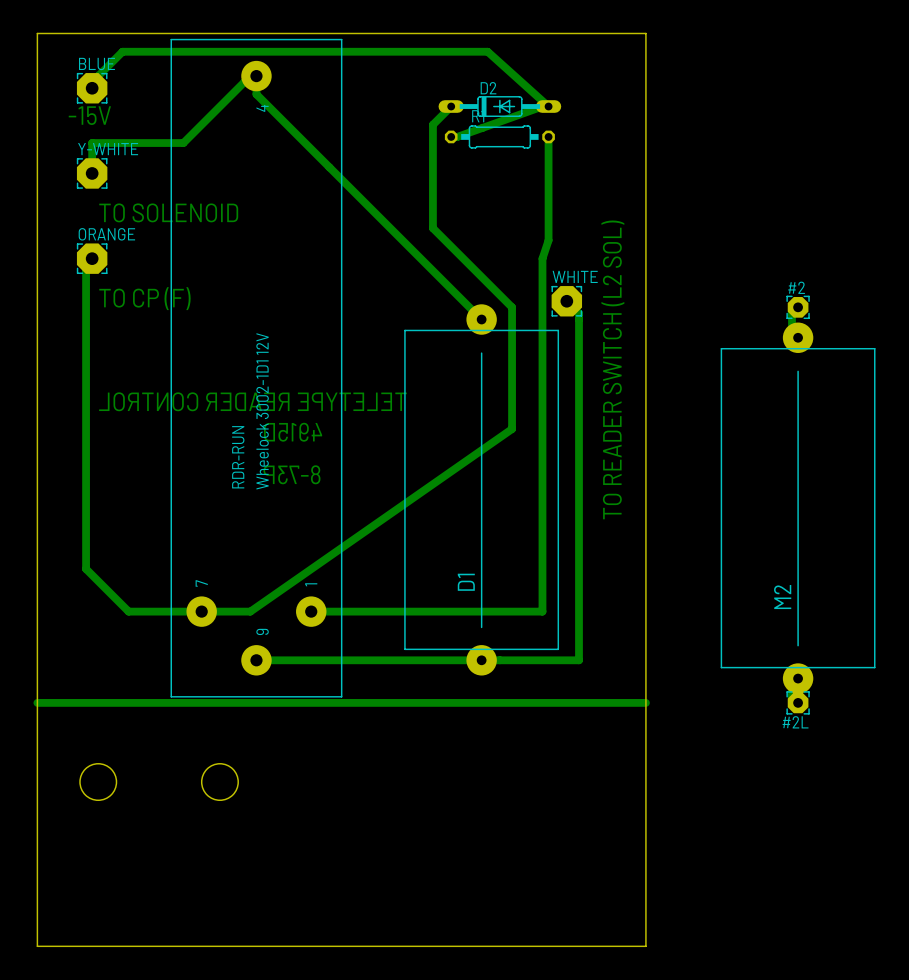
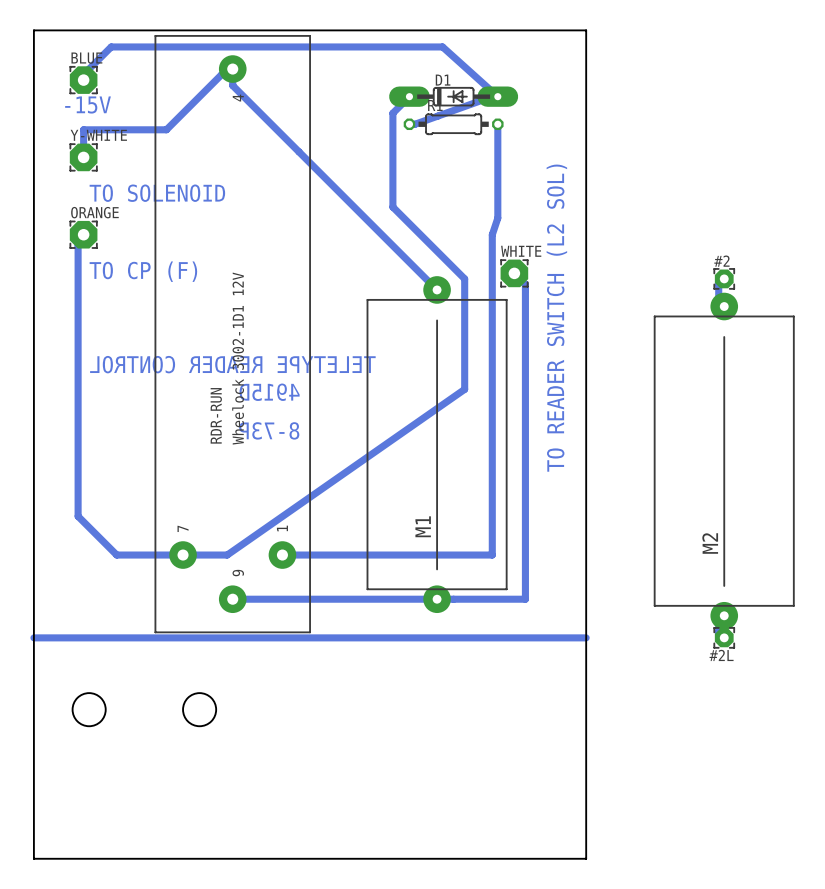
D2: (499, 106) -> none
D1: none -> (453, 96)
D1 name: D1 (466, 582) -> M1 (423, 526)

